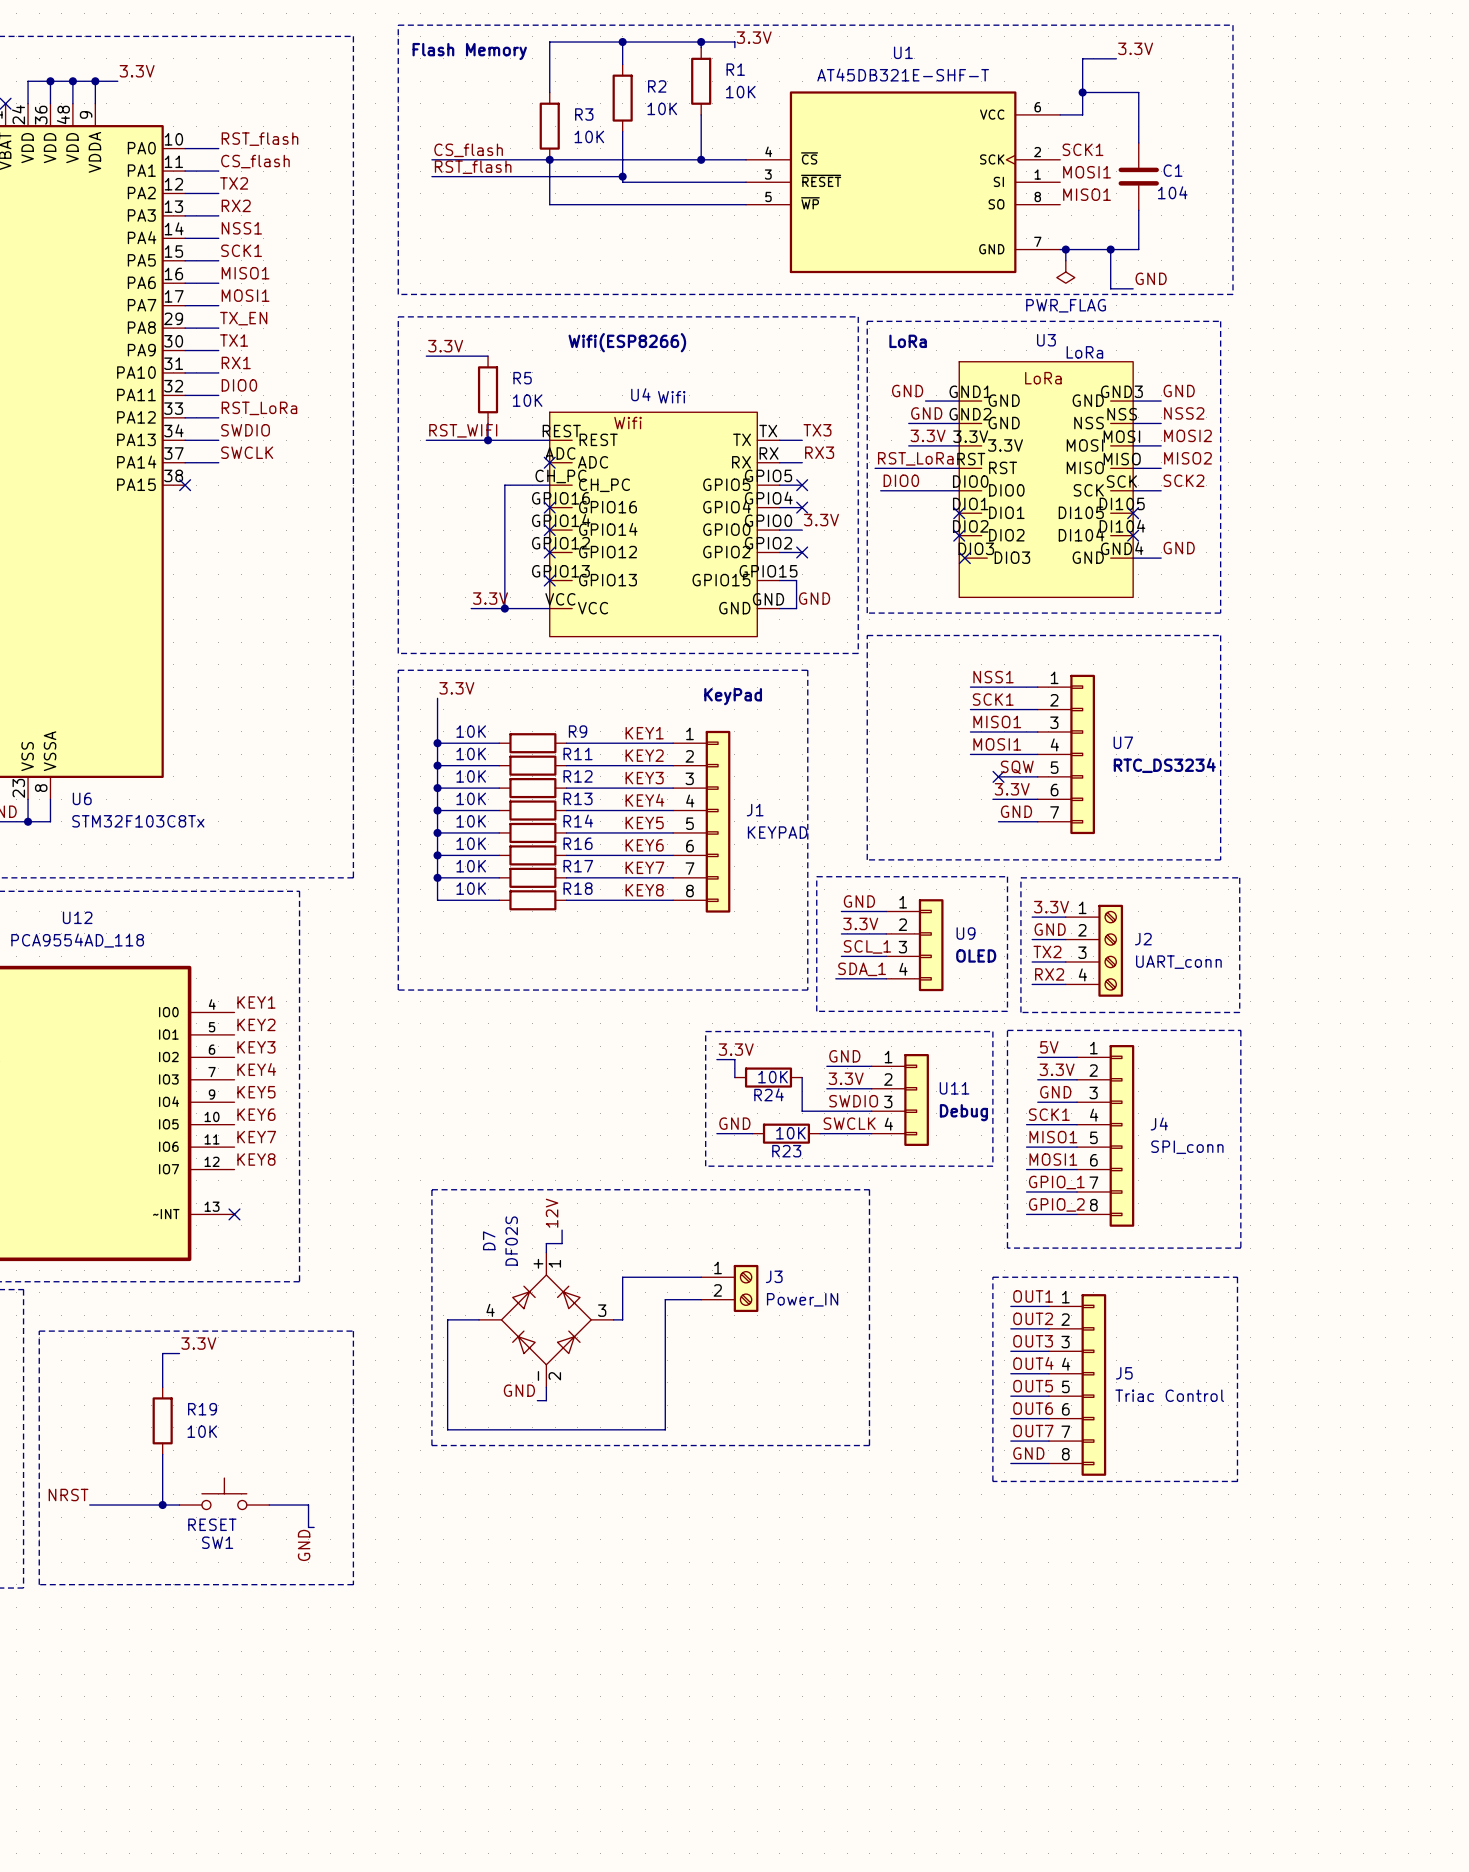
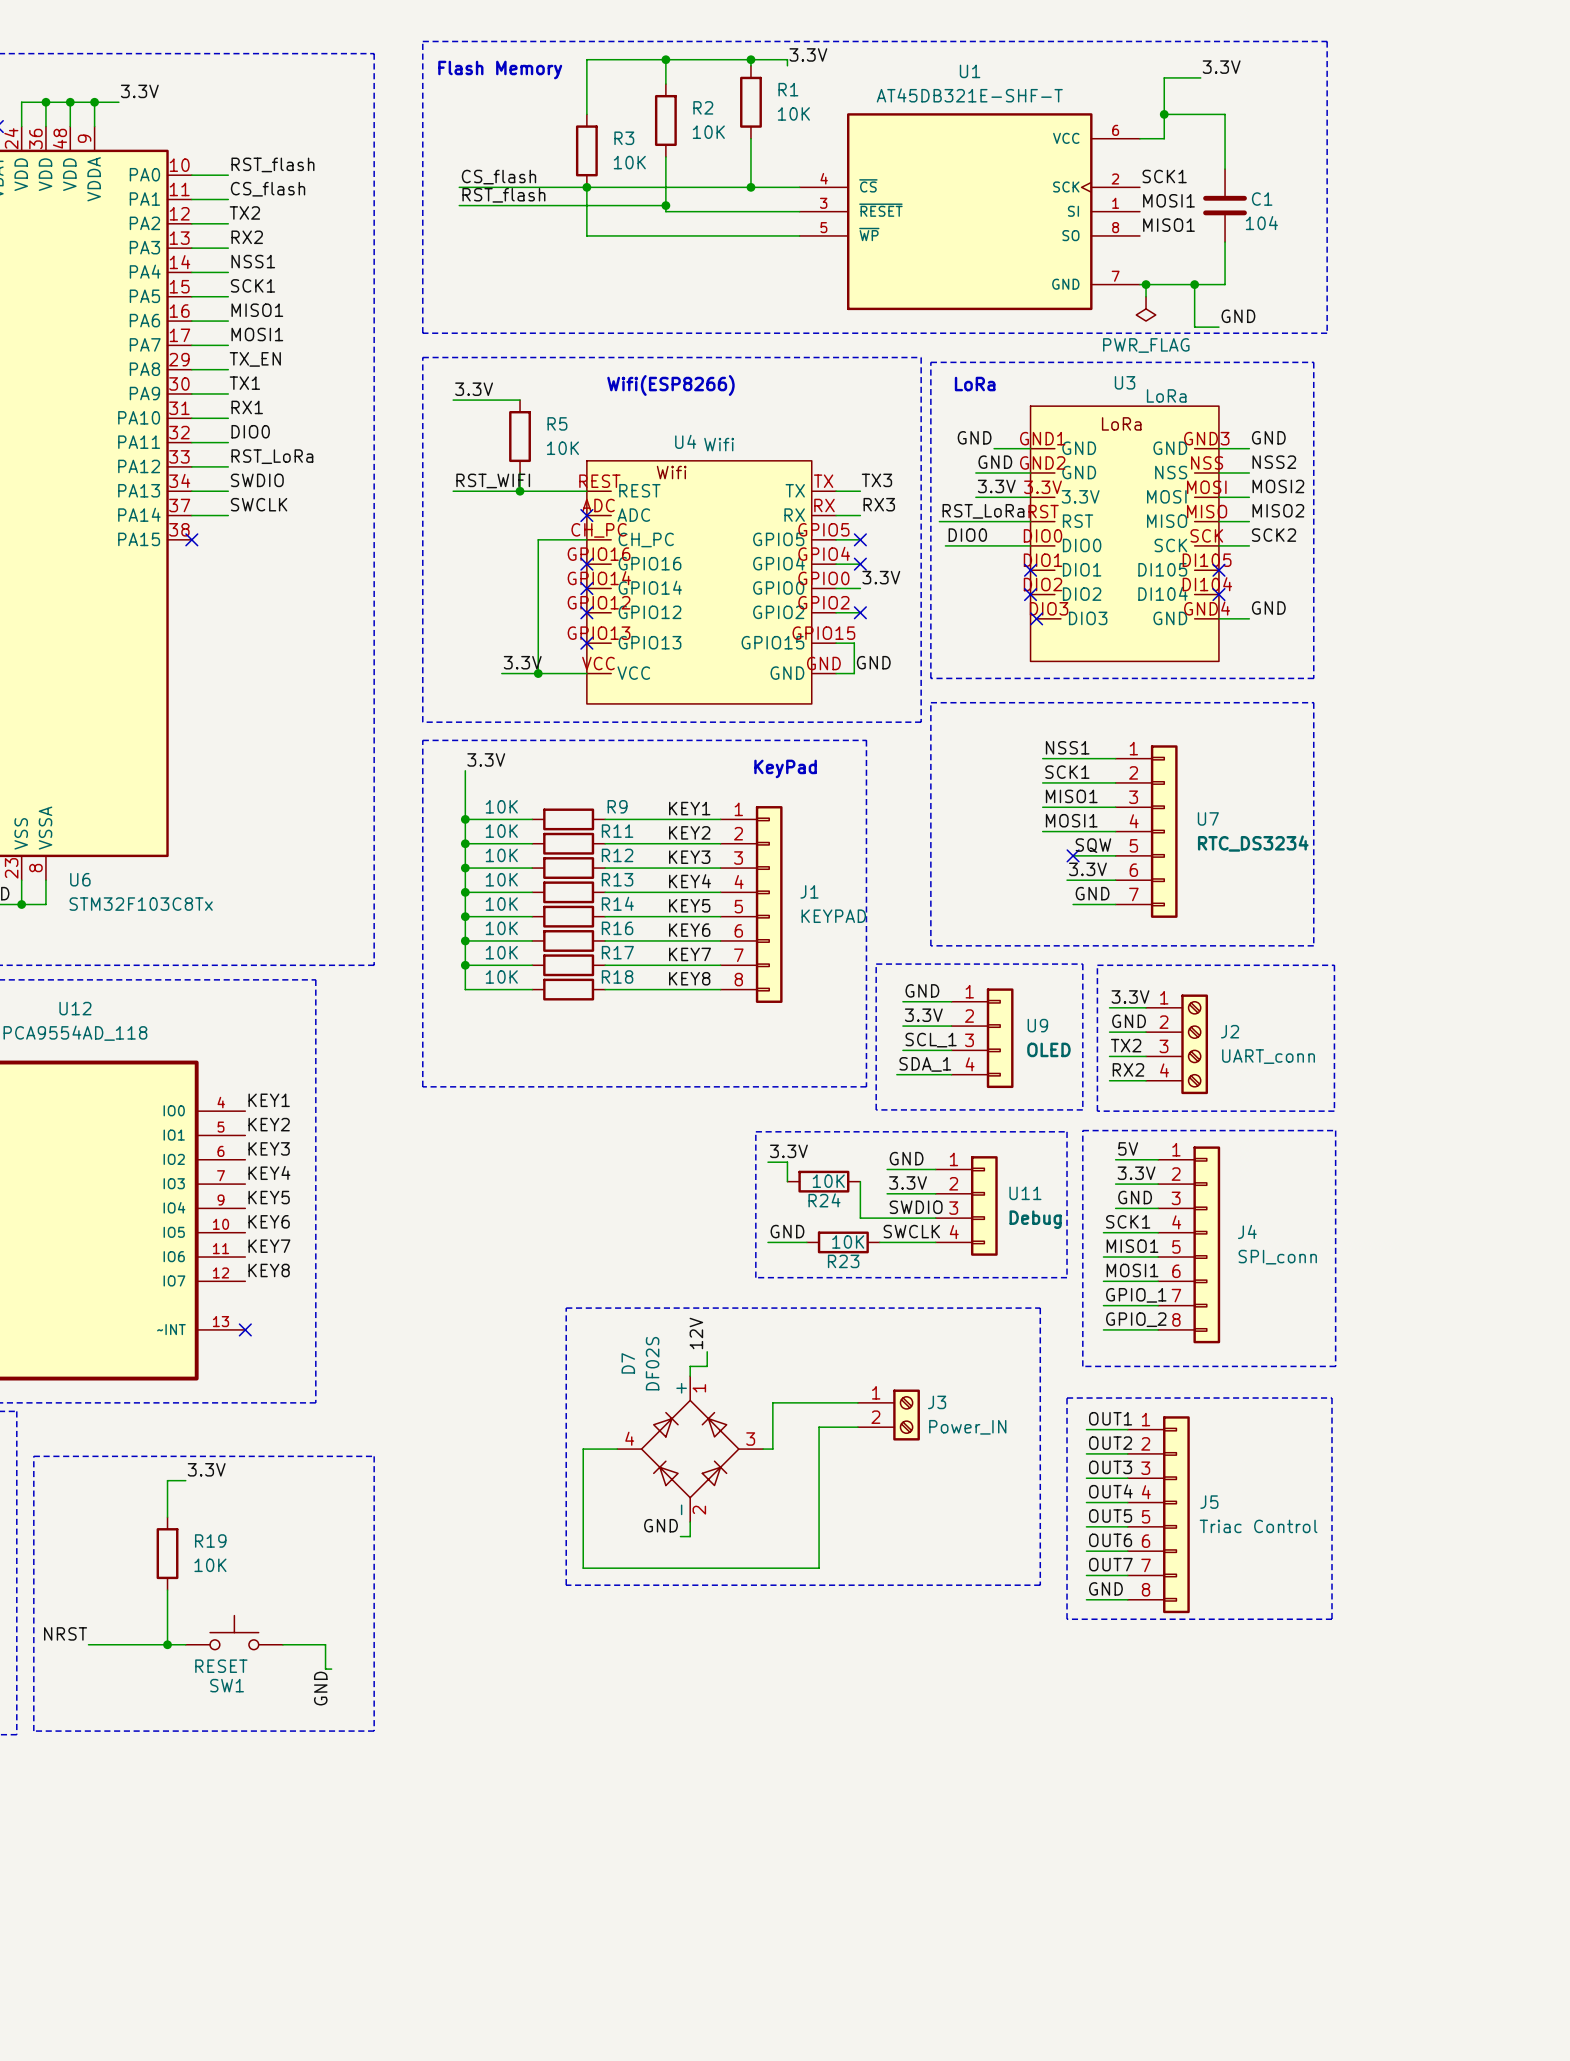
line: (431, 1189) (869, 1189) (869, 1445) (431, 1445) (431, 1189) -> (566, 1308) (566, 1585) (1040, 1585) (1040, 1308) (566, 1308)
label position: 12V (552, 1213) -> 12V (696, 1333)
wire: (562, 1230) (562, 1243) (546, 1243) (546, 1252) -> (707, 1351) (707, 1366) (690, 1366) (690, 1376)
wire: (701, 1277) (622, 1277) (622, 1319) (613, 1319) -> (857, 1402) (772, 1402) (772, 1449) (763, 1449)
J3 position: (729, 1288) -> (888, 1415)
wire: (701, 1299) (665, 1299) (665, 1429) (447, 1429) (447, 1319) (479, 1319) -> none
D7 position: (546, 1319) -> (690, 1449)
wire: none -> (617, 1449) (583, 1449) (583, 1517)
label position: GND (519, 1390) -> GND (660, 1525)
wire: none -> (690, 1521) (690, 1536) (680, 1536)
wire: (537, 1400) (546, 1400) -> (857, 1427) (819, 1427) (819, 1568) (583, 1568) (583, 1531)

